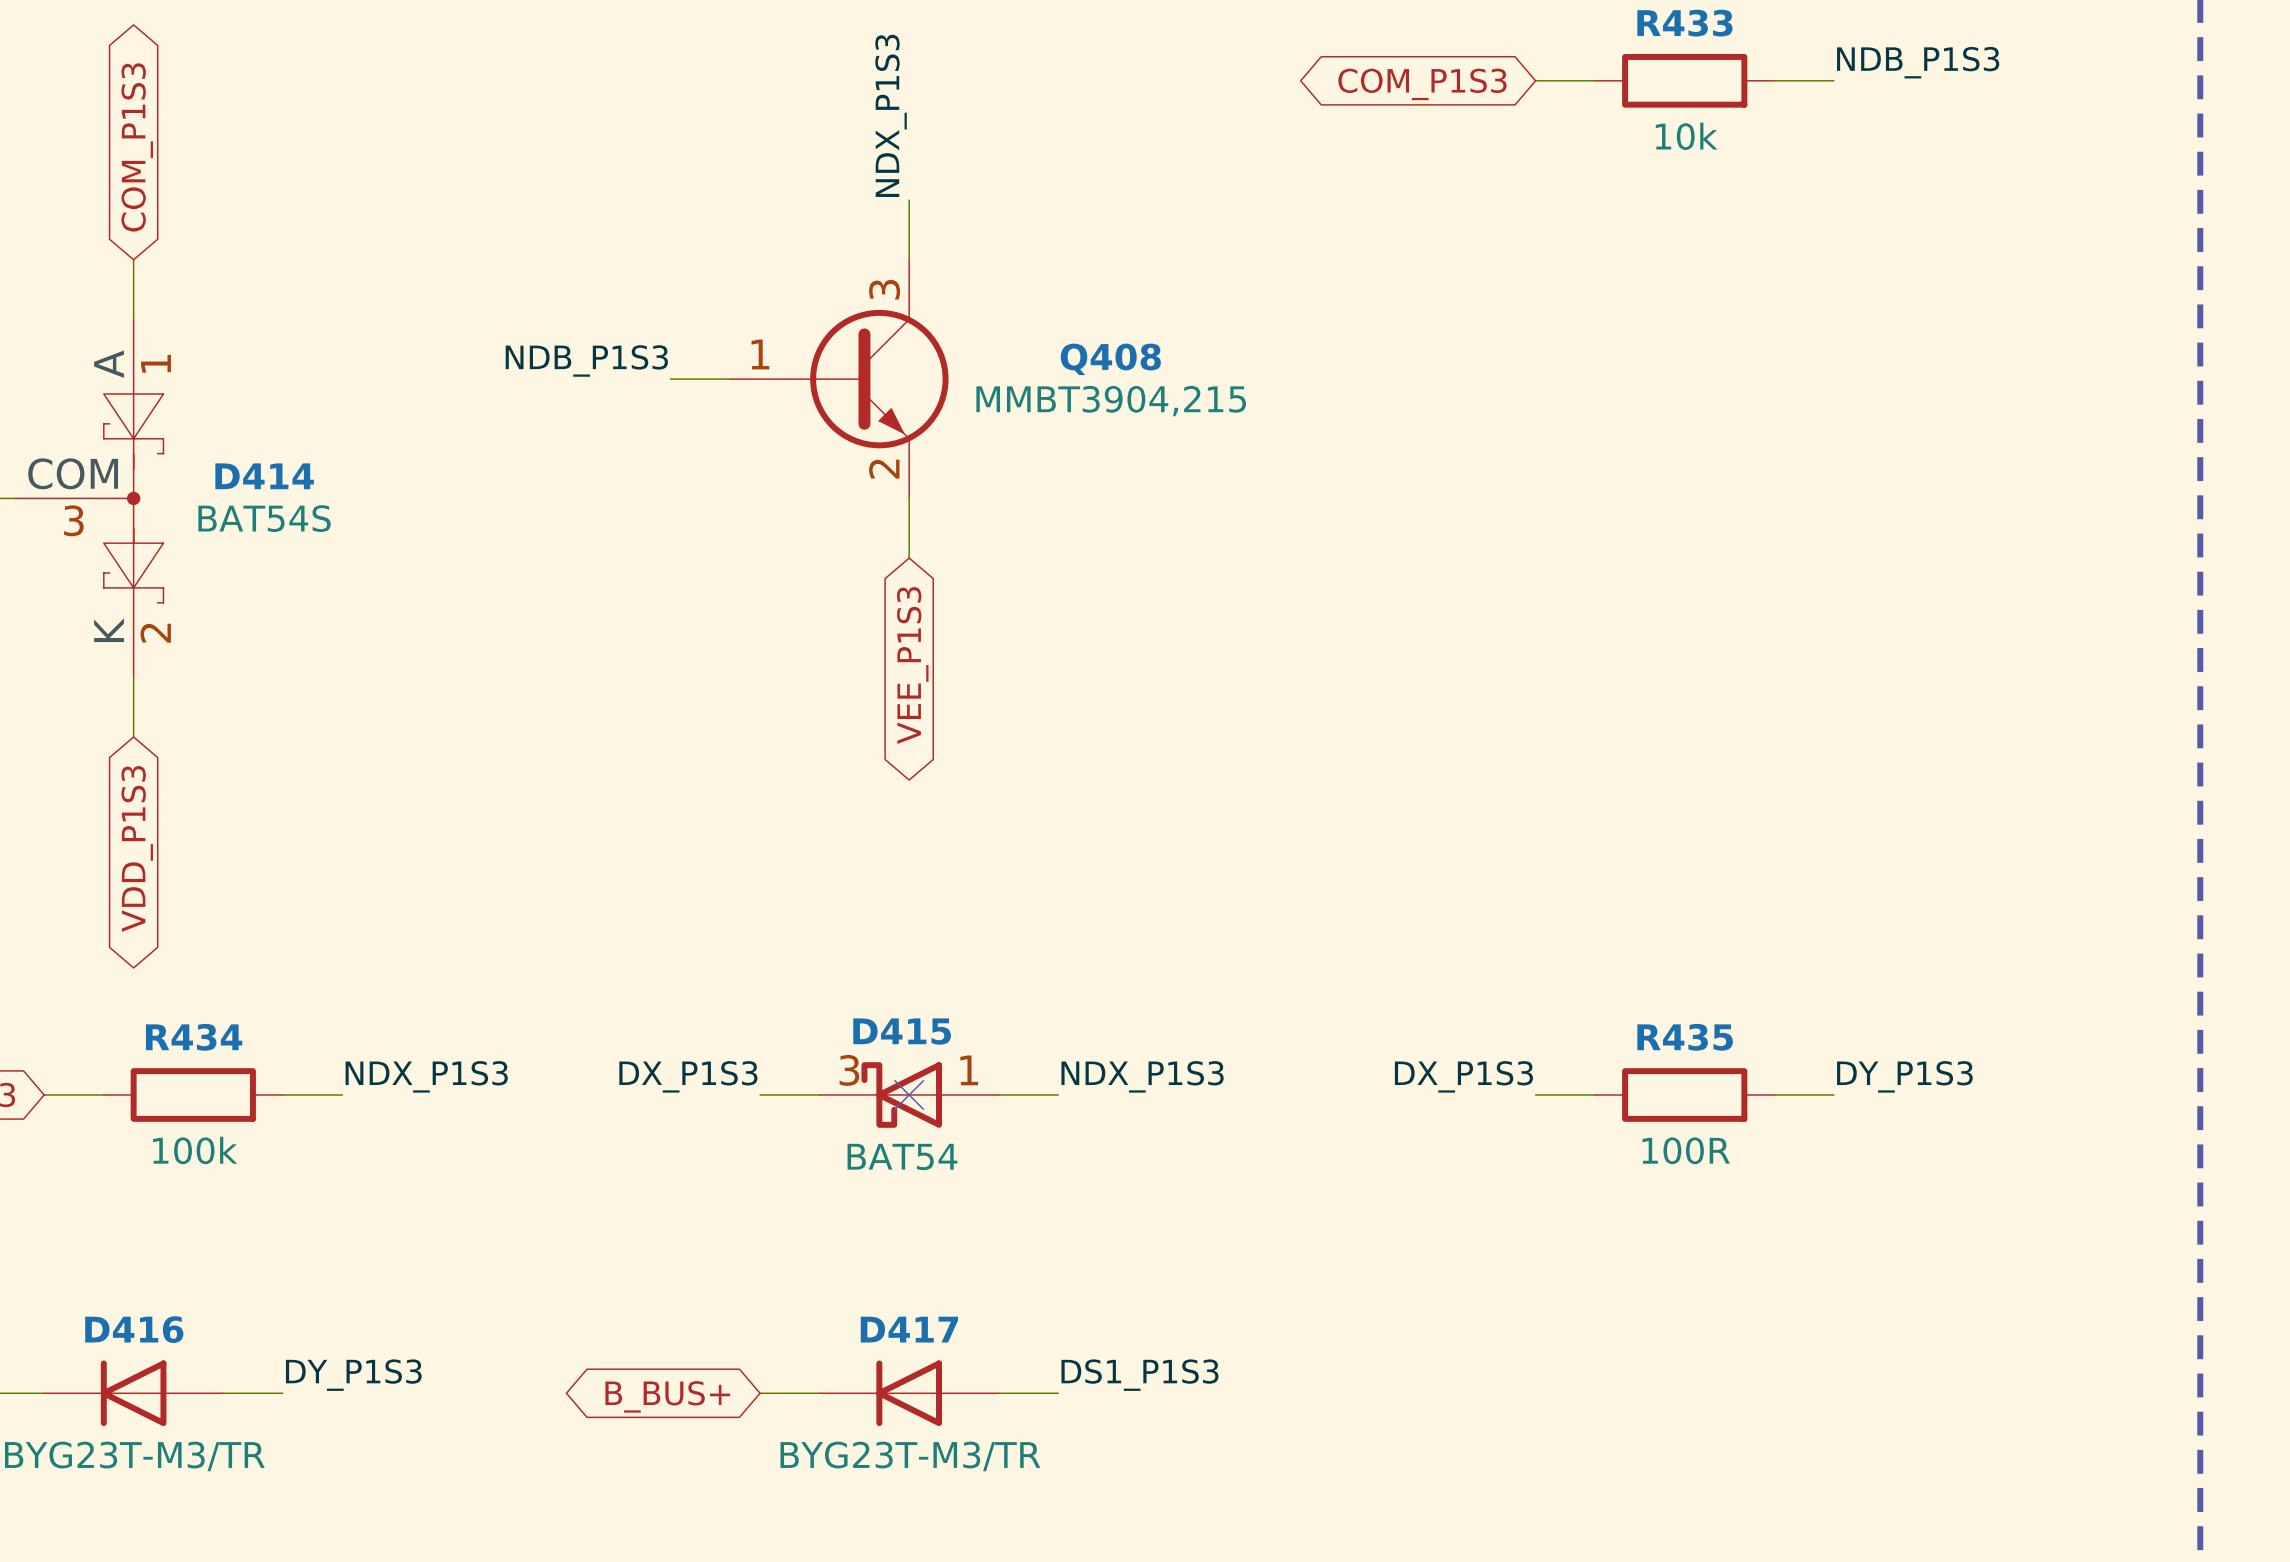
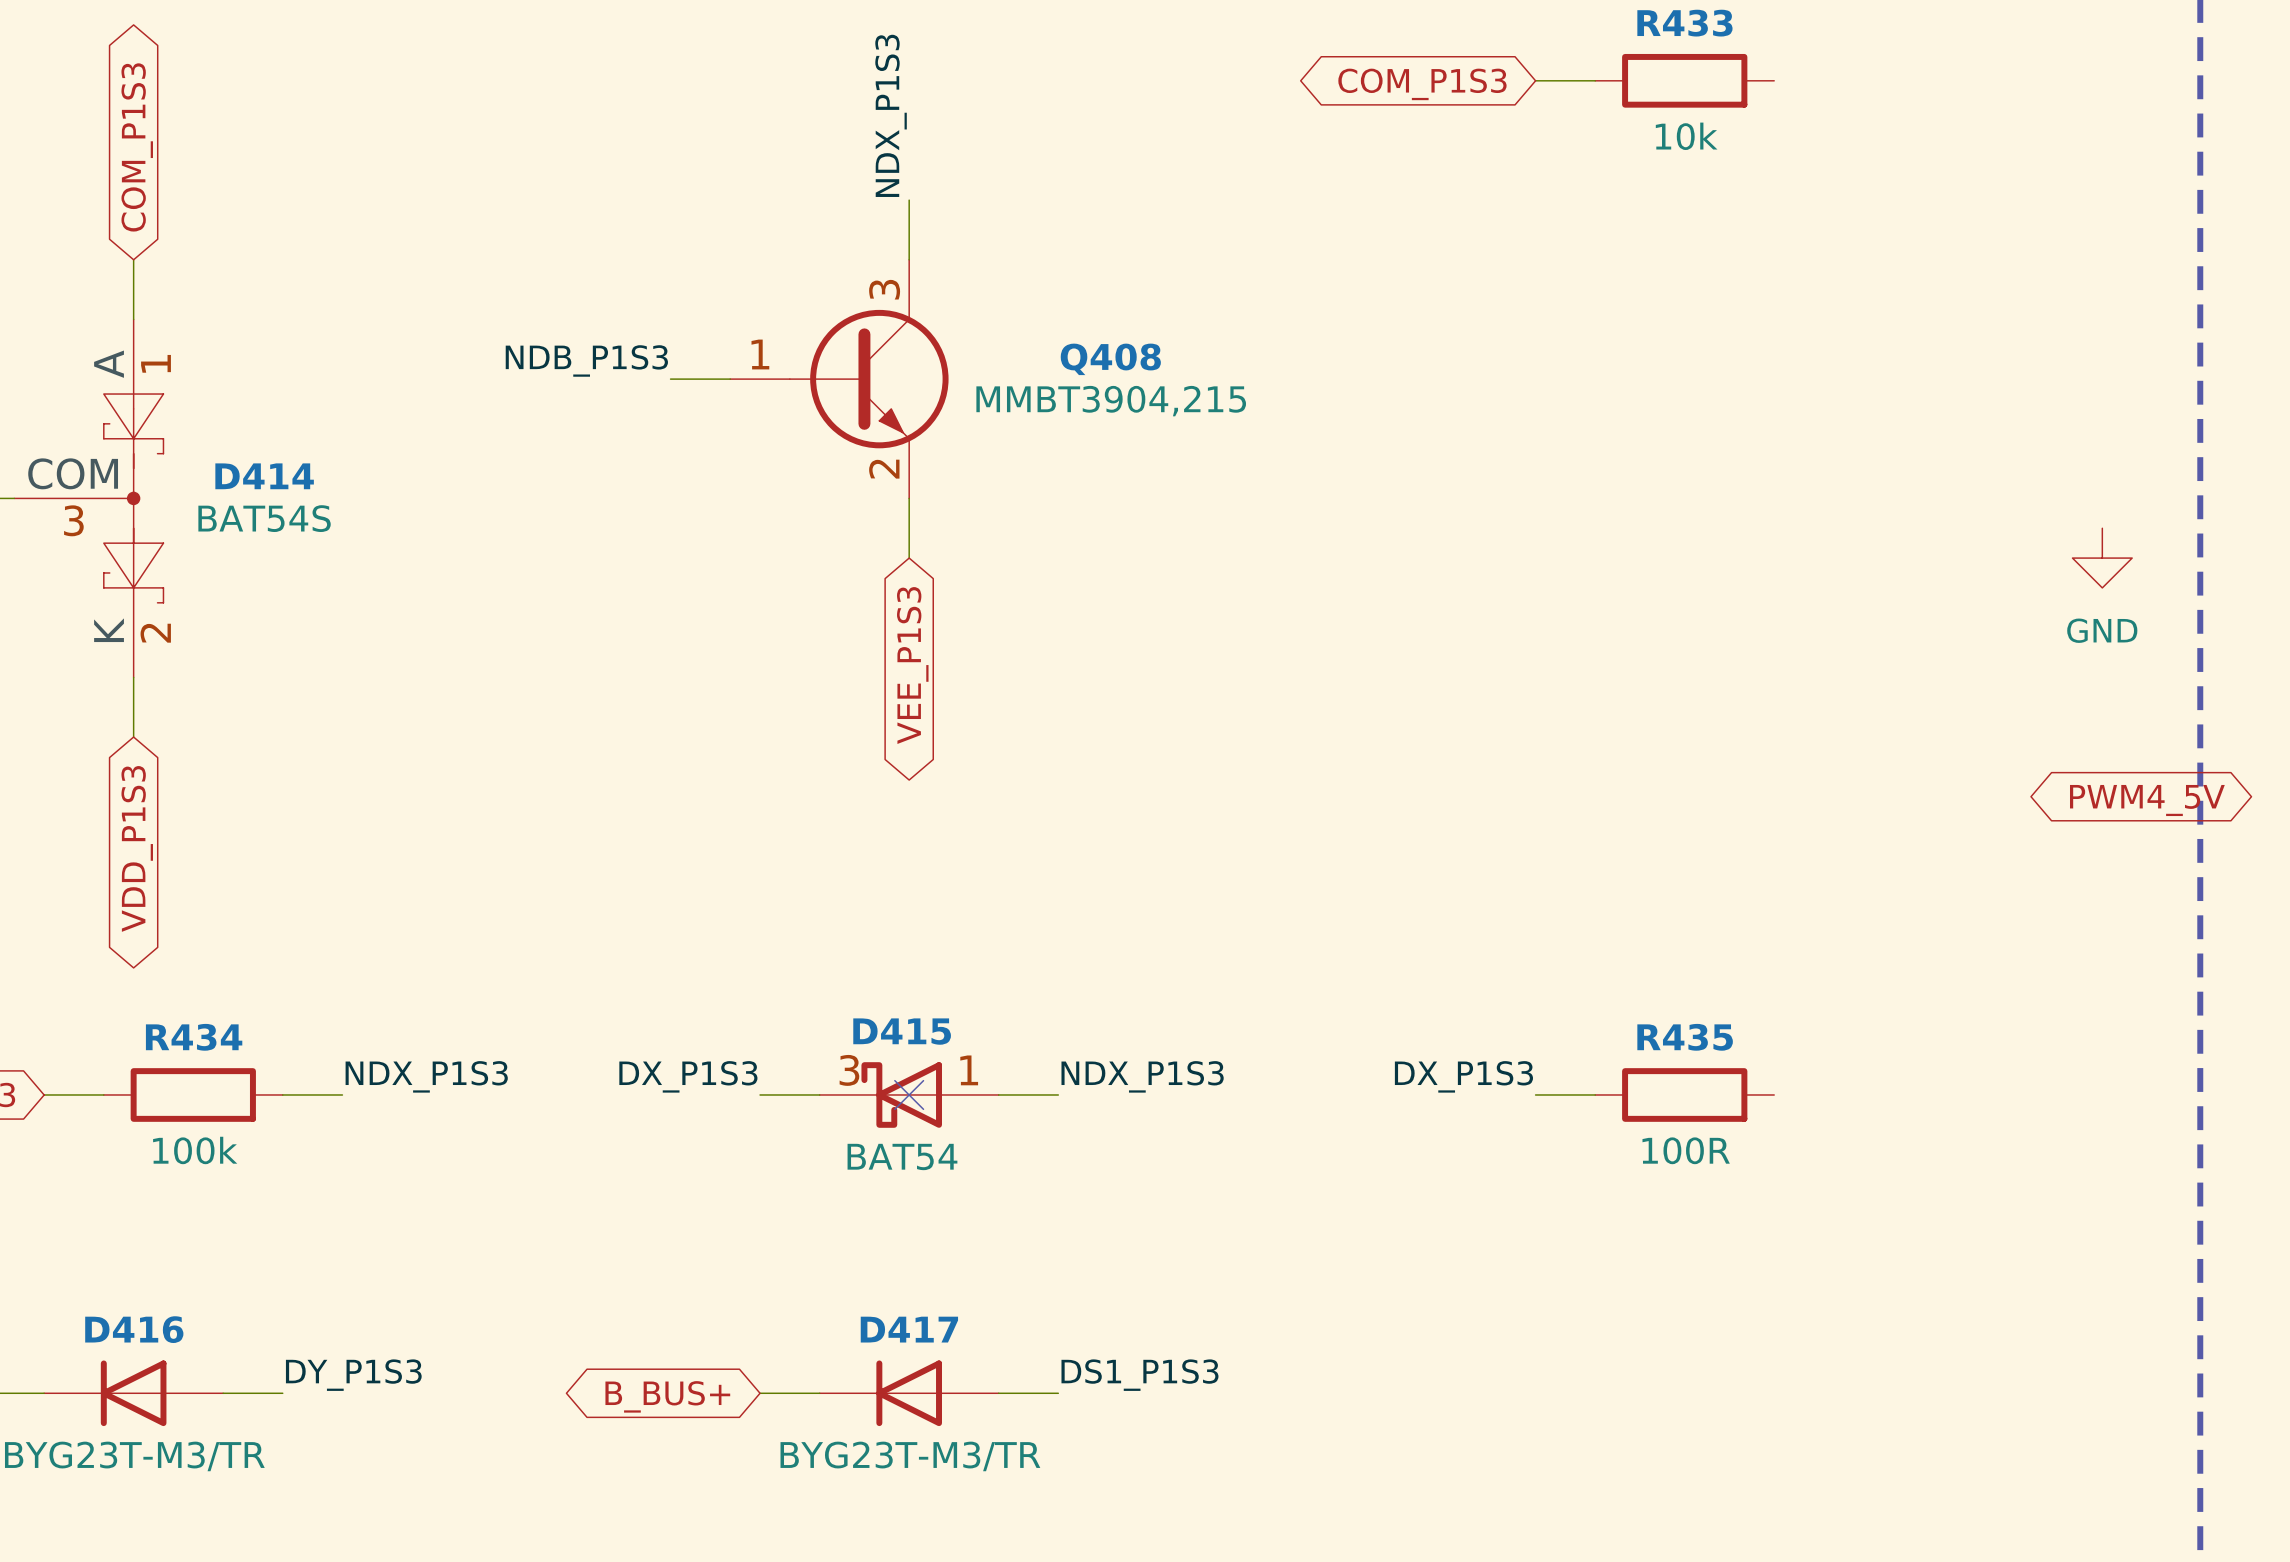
label: NDB_P1S3 (1918, 62) -> none
wire: (1774, 80) (1833, 80) -> none
power symbol: none -> GND (2102, 558)
global label: none -> PWM4_5V (2147, 800)
label: DY_P1S3 (1904, 1076) -> none
wire: (1774, 1094) (1833, 1094) -> none

